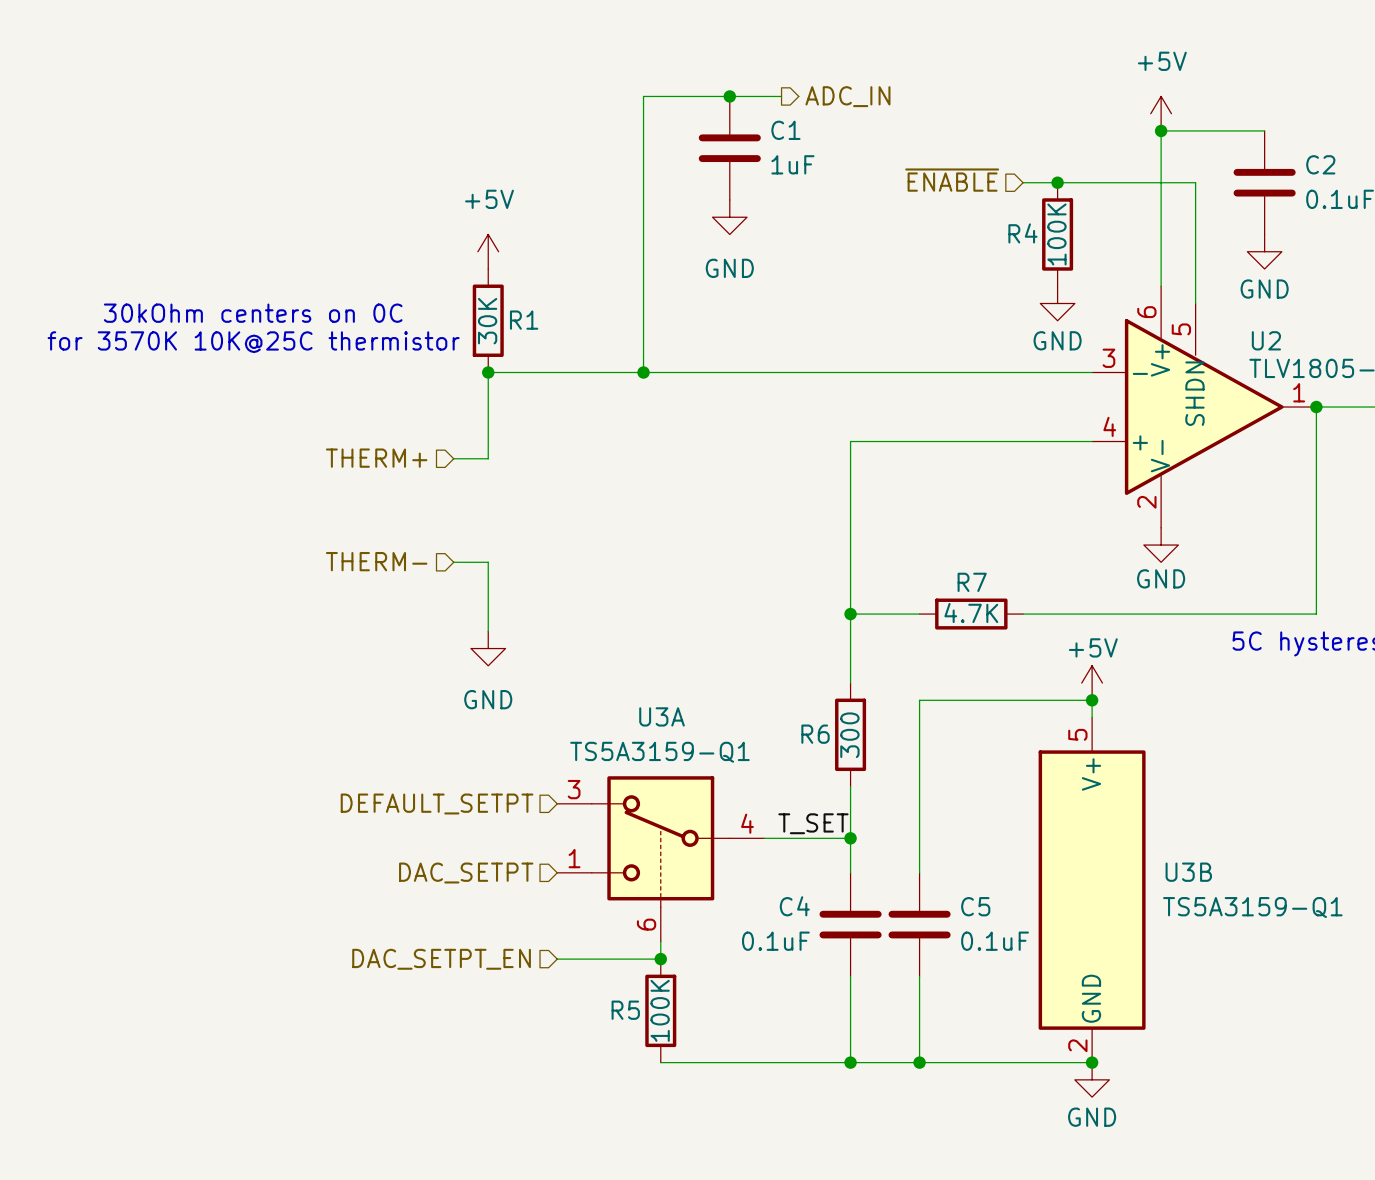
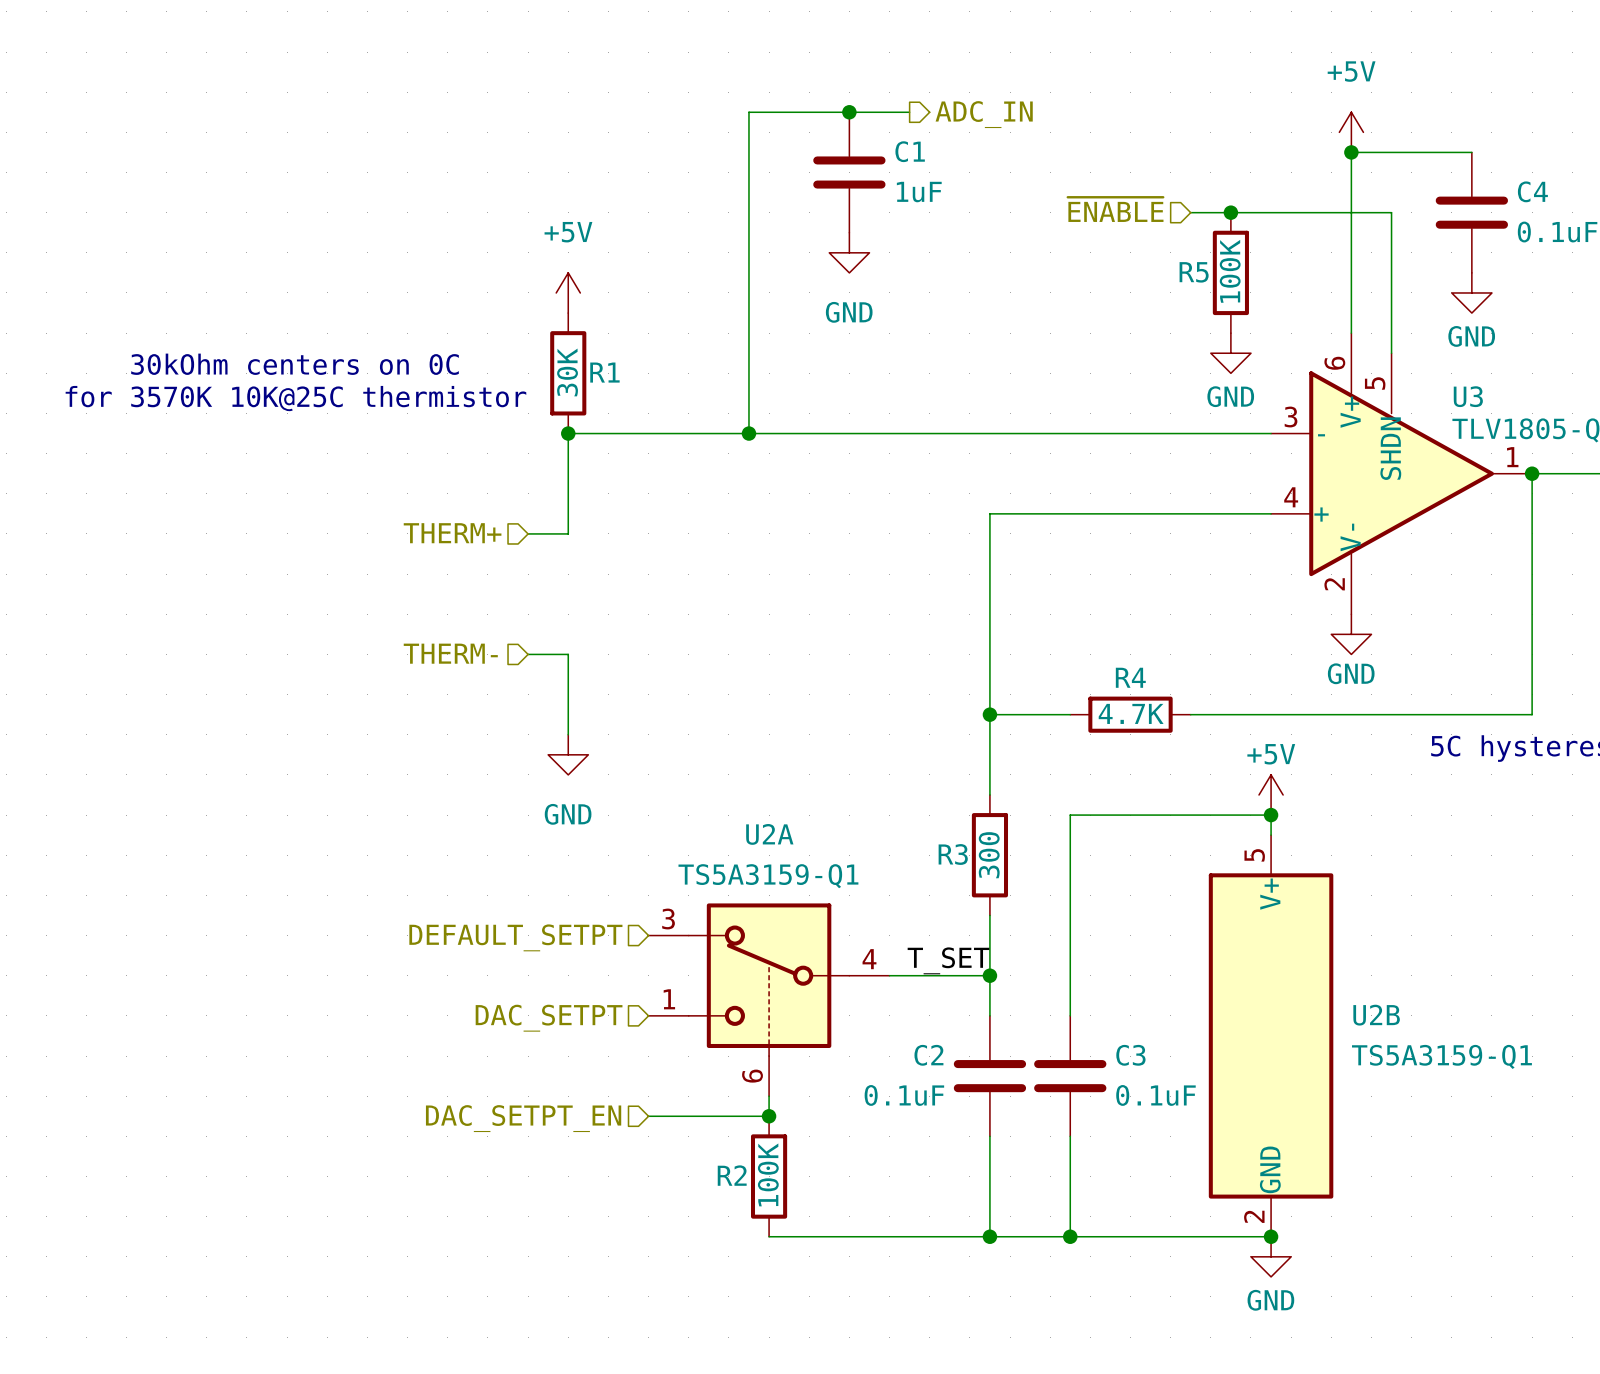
C2 name: C2 (1320, 164) -> C4 (1532, 191)
R4 name: R4 (1022, 233) -> R5 (1194, 272)
U2 name: U2 (1266, 340) -> U3 (1468, 396)
R7 name: R7 (972, 582) -> R4 (1130, 677)
U3A name: U3A (662, 716) -> U2A (769, 834)
R6 name: R6 (815, 734) -> R3 (953, 854)
U3B name: U3B (1188, 872) -> U2B (1376, 1015)
C4 name: C4 (794, 906) -> C2 (928, 1055)
C5 name: C5 (975, 906) -> C3 (1130, 1055)
R5 name: R5 (625, 1010) -> R2 (732, 1175)

